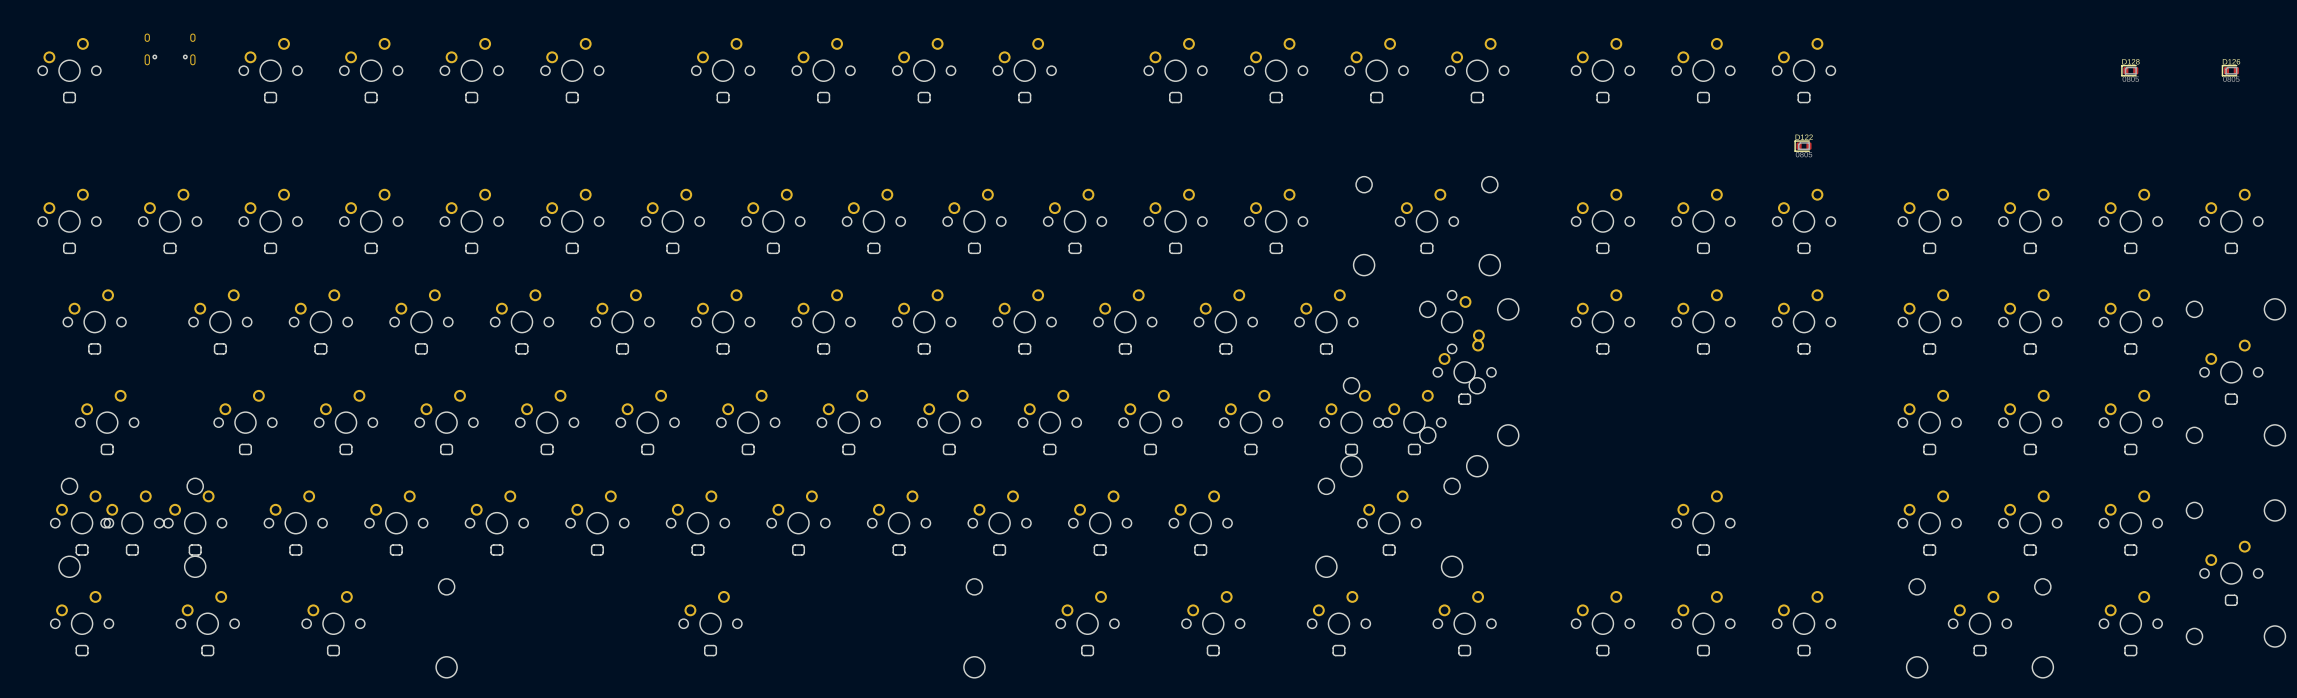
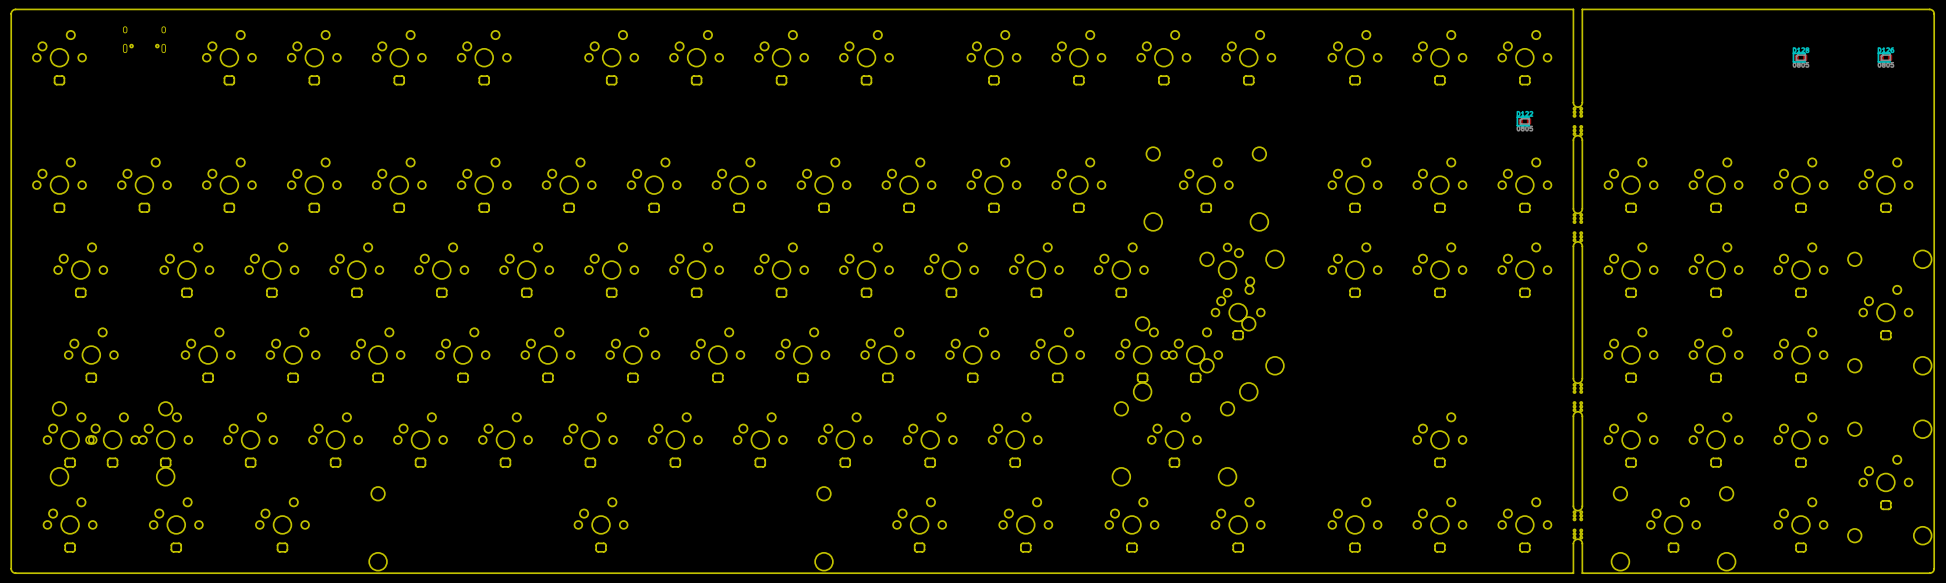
board edge: none -> (15, 9) (1573, 9) (1573, 102) (1577, 107) (1582, 102) (1582, 9) (1930, 9) (1934, 13) (1934, 569) (1929, 573) (1582, 573) (1582, 543) (1577, 539) (1573, 543) (1573, 573) (14, 573) (11, 568) (11, 13) (15, 9)
part: none -> (1577, 121)
board edge: none -> (1573, 140) (1573, 209) (1578, 213) (1582, 208) (1582, 139) (1577, 135) (1573, 140)
part: none -> (1577, 227)
board edge: none -> (1573, 246) (1573, 378) (1577, 383) (1582, 378) (1582, 246) (1577, 241) (1573, 246)
part: none -> (1577, 397)
board edge: none -> (1573, 416) (1573, 506) (1577, 510) (1582, 506) (1582, 416) (1577, 411) (1573, 416)
part: none -> (1577, 524)

